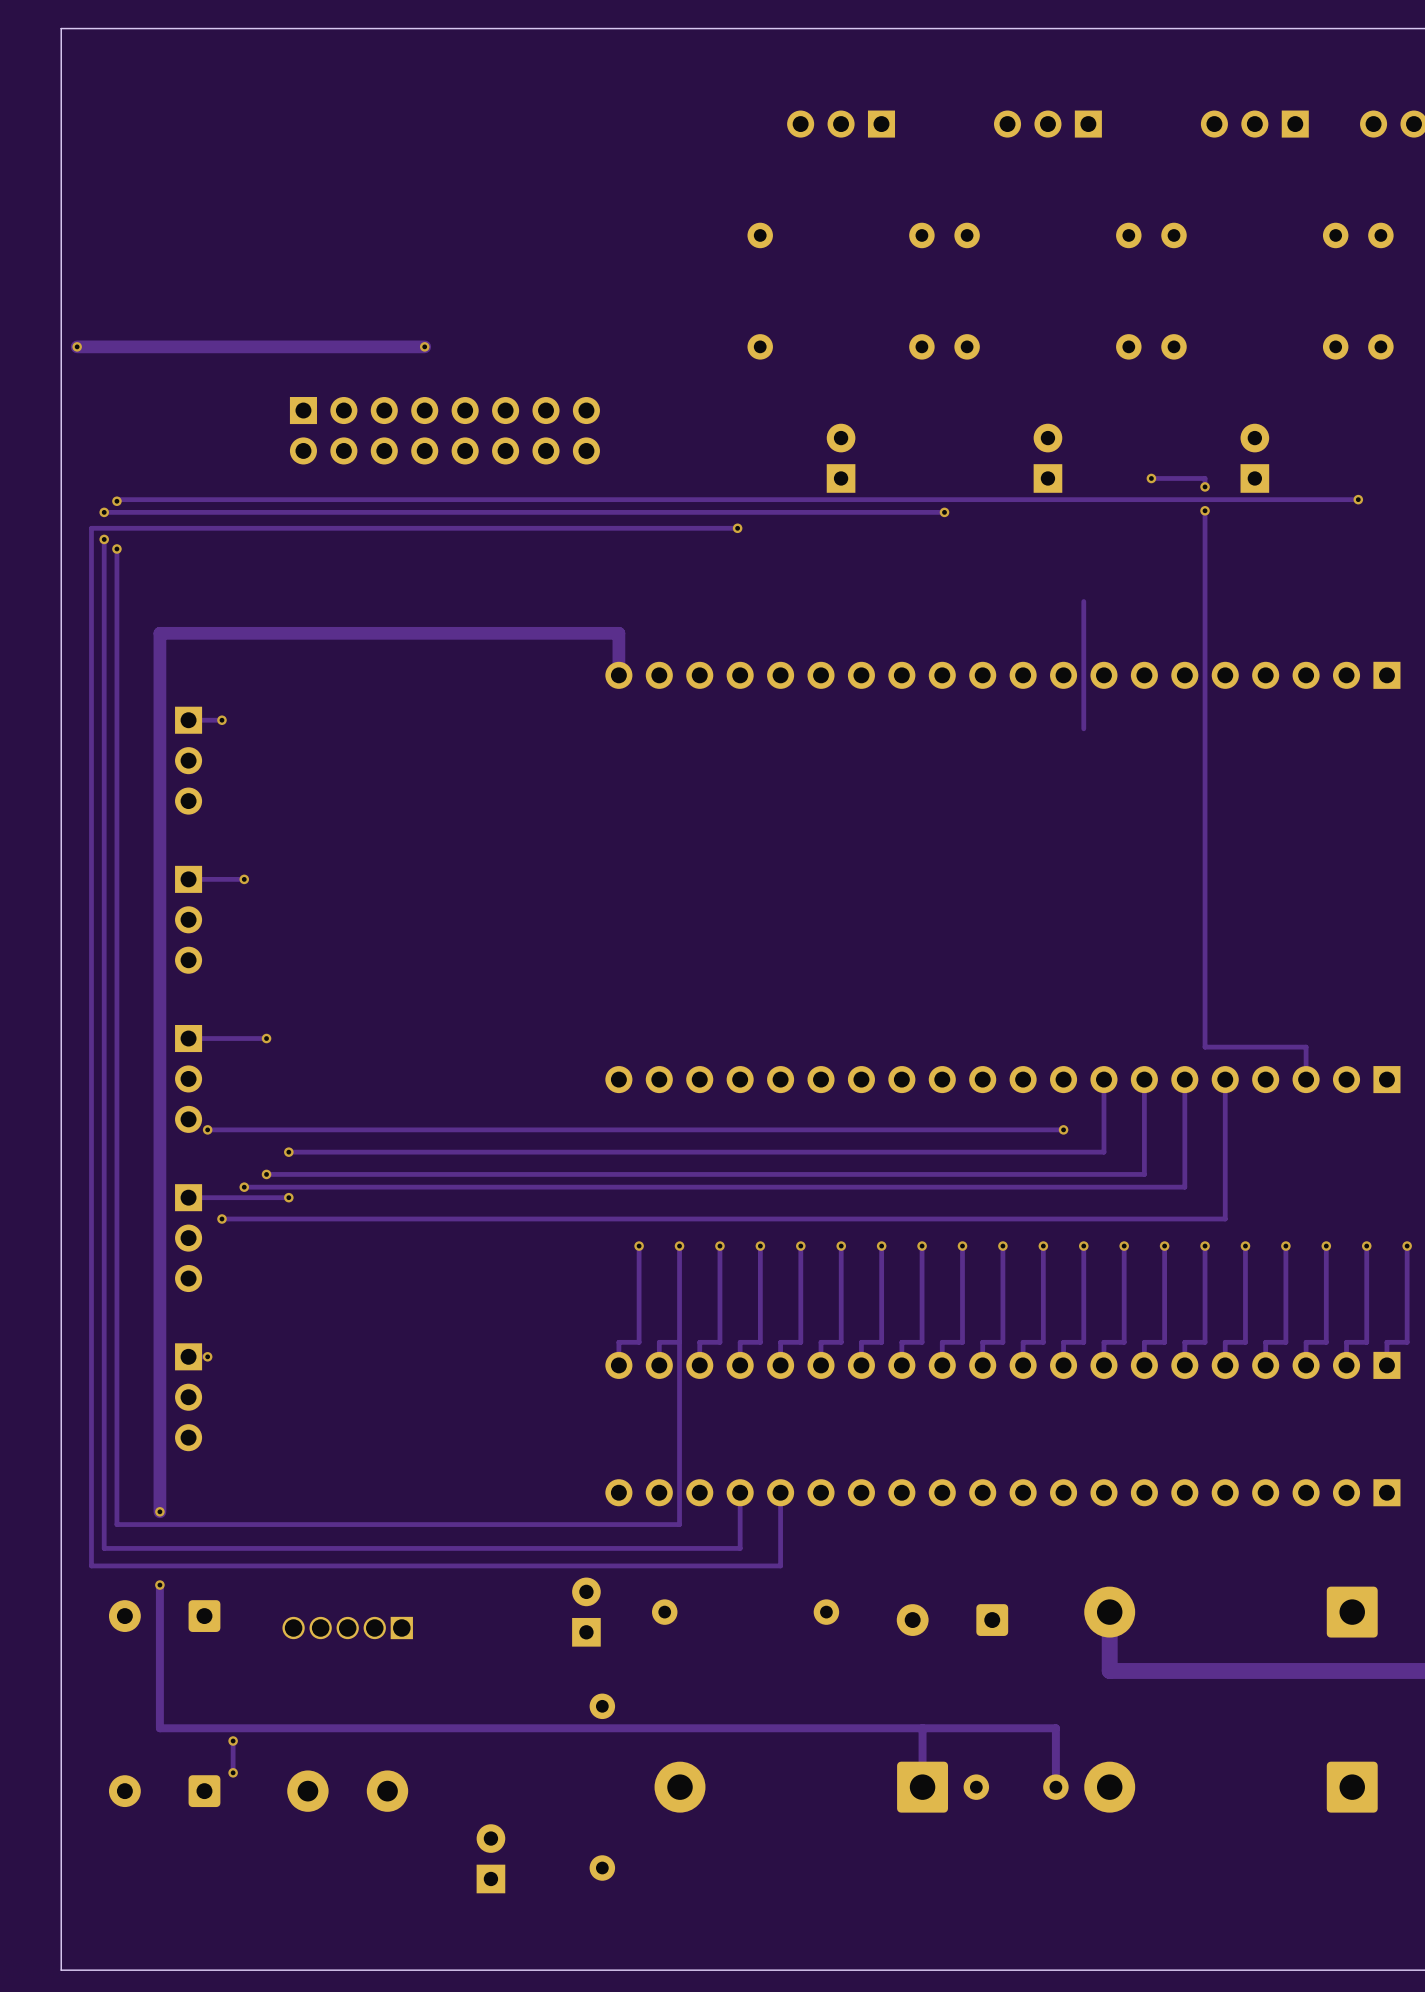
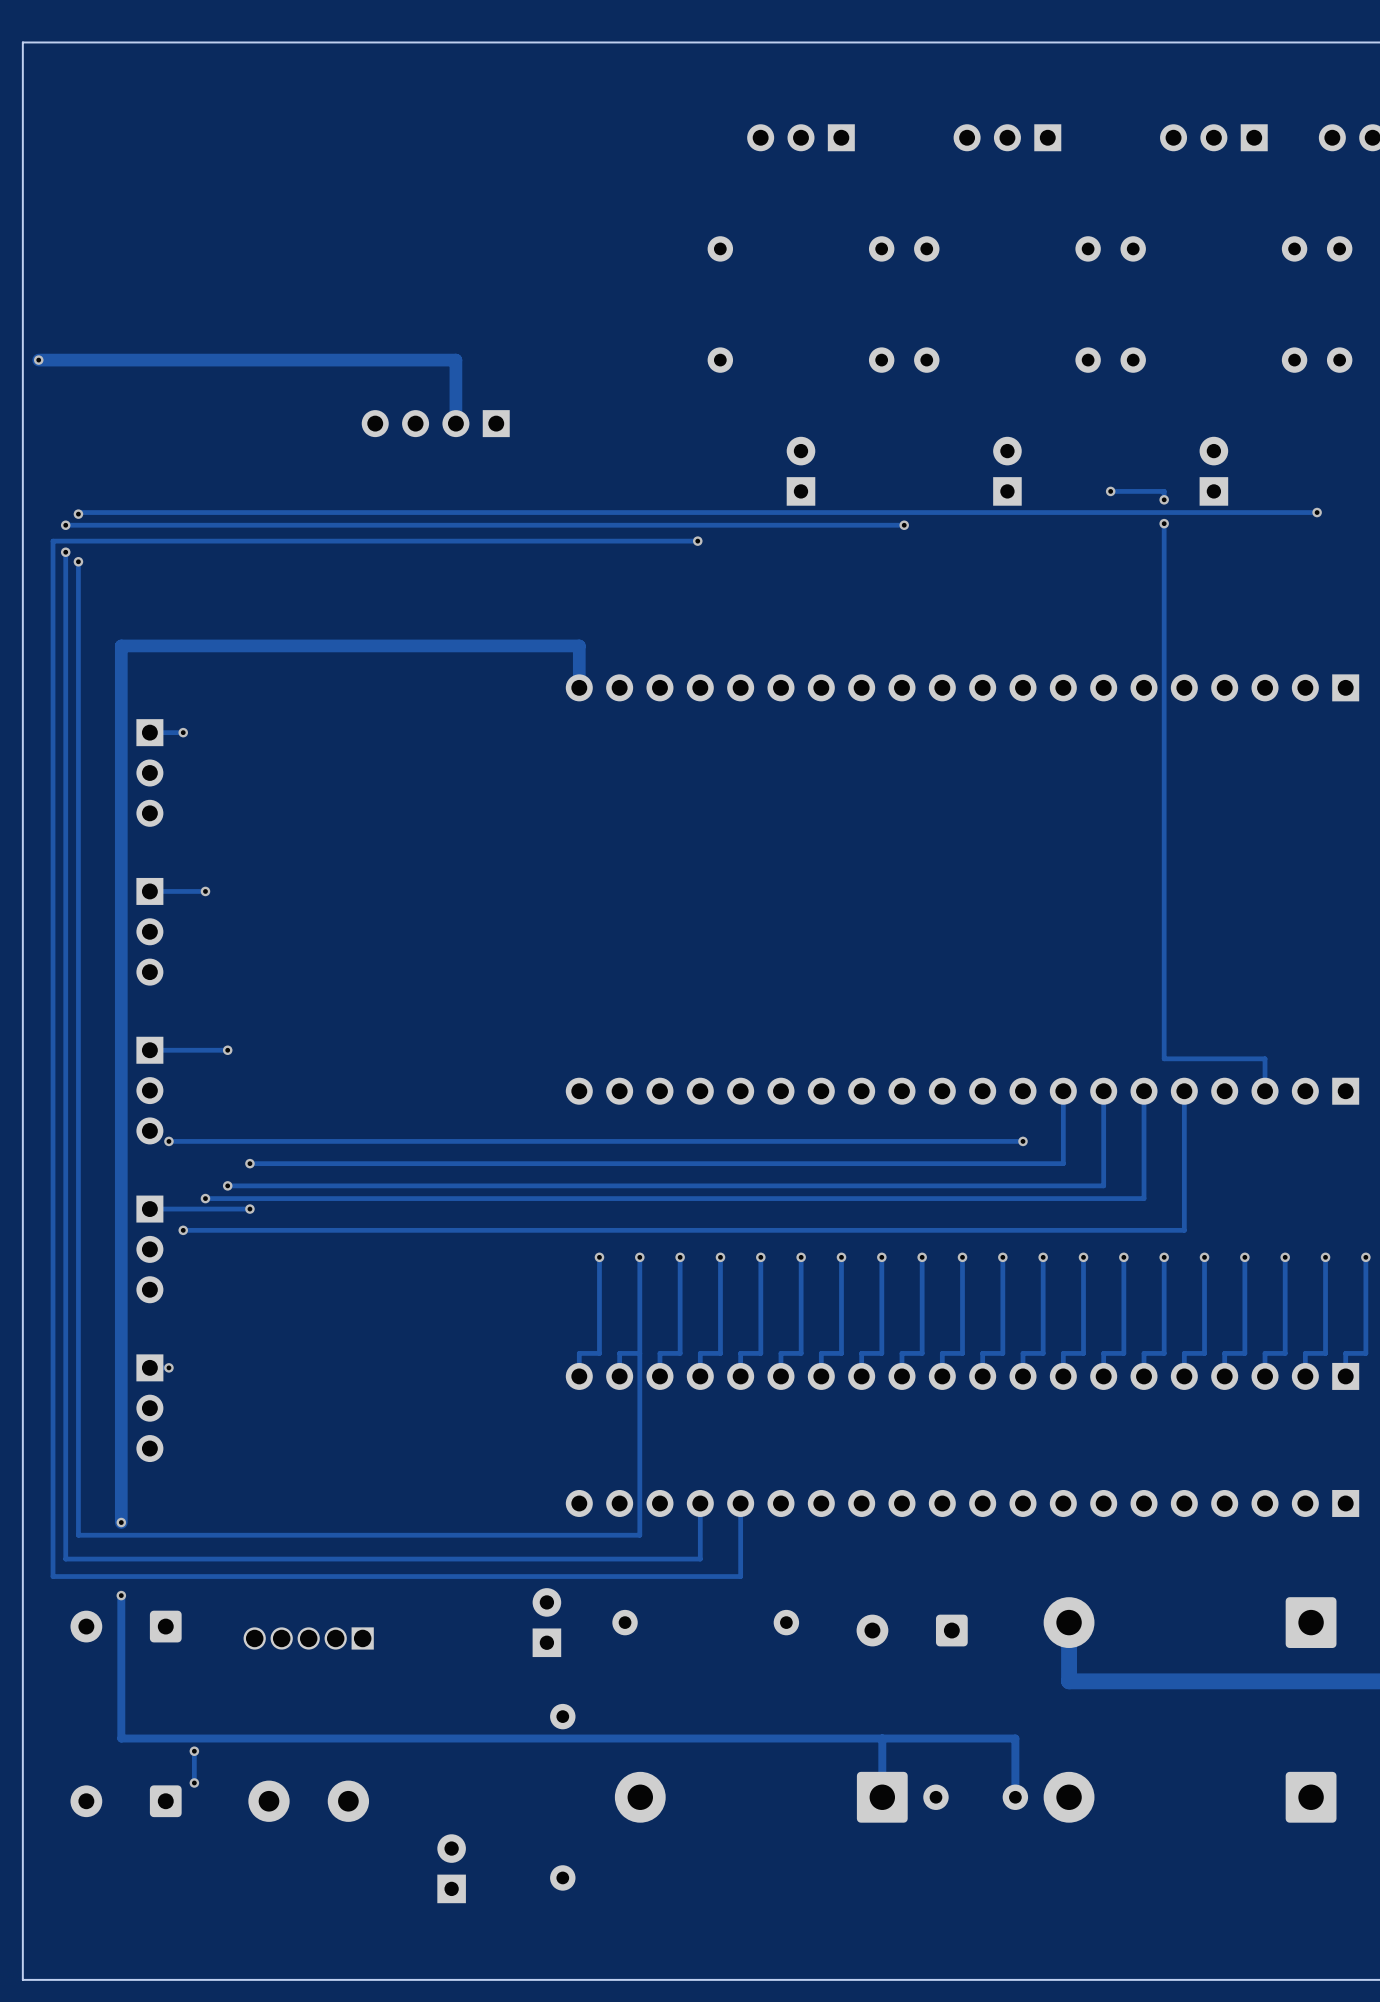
track: none -> (385, 360) (455, 360) (455, 423)
via: (424, 346) -> none
part: none -> (435, 423)
part: (444, 430) -> none
track: (1083, 601) (1083, 728) -> none

